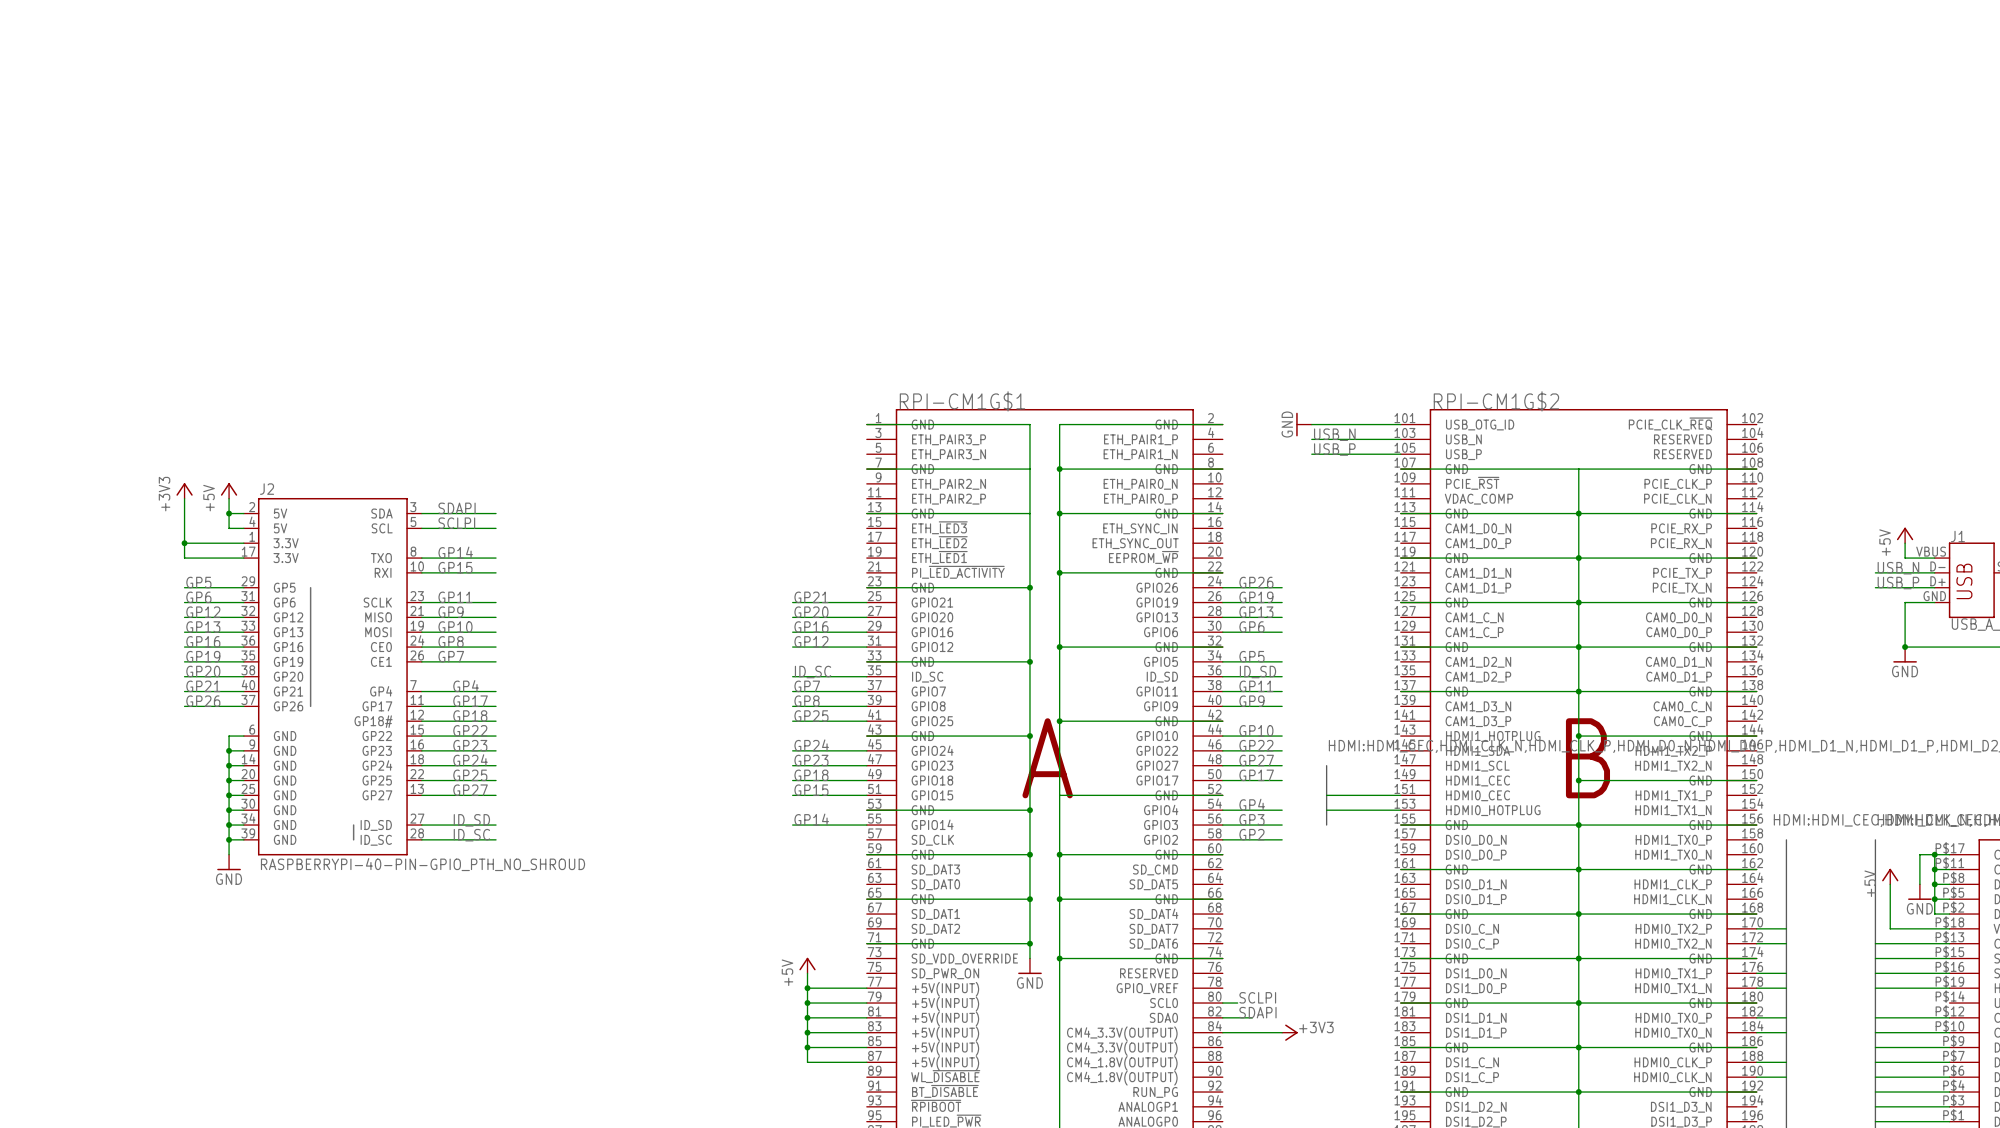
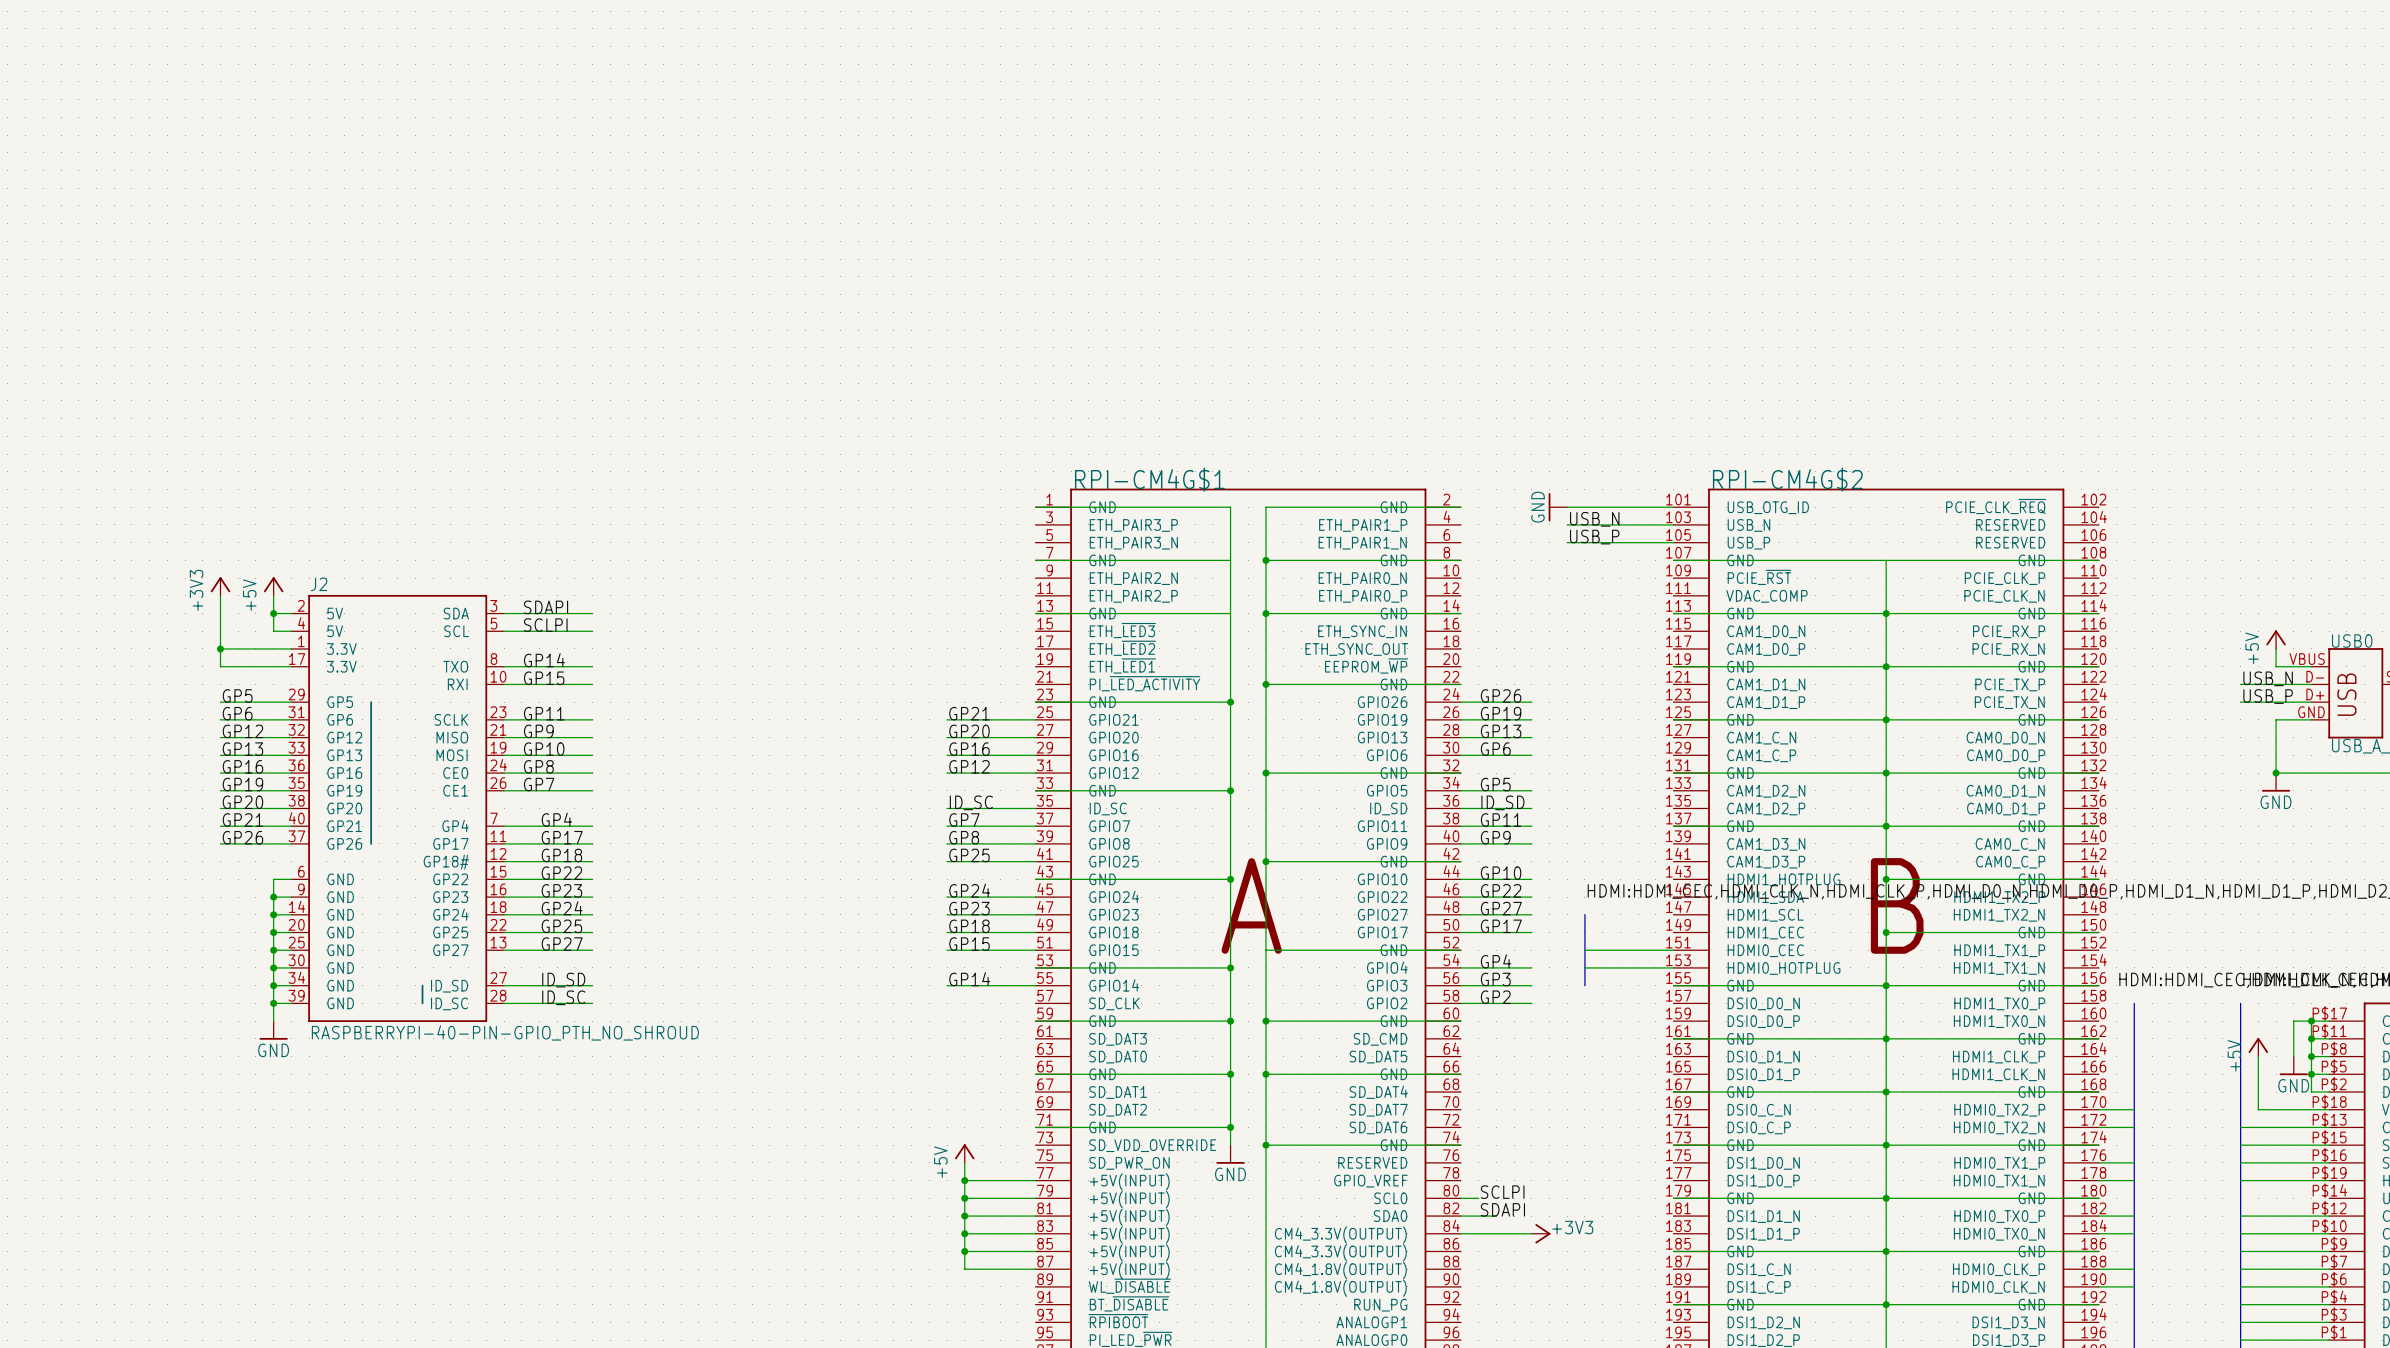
RPI-CM1G$1 name: RPI-CM1G$1 (962, 401) -> RPI-CM4G$1 (1149, 479)
RPI-CM1G$2 name: RPI-CM1G$2 (1496, 401) -> RPI-CM4G$2 (1787, 479)
J1 name: J1 (1957, 536) -> USB0 (2352, 641)

